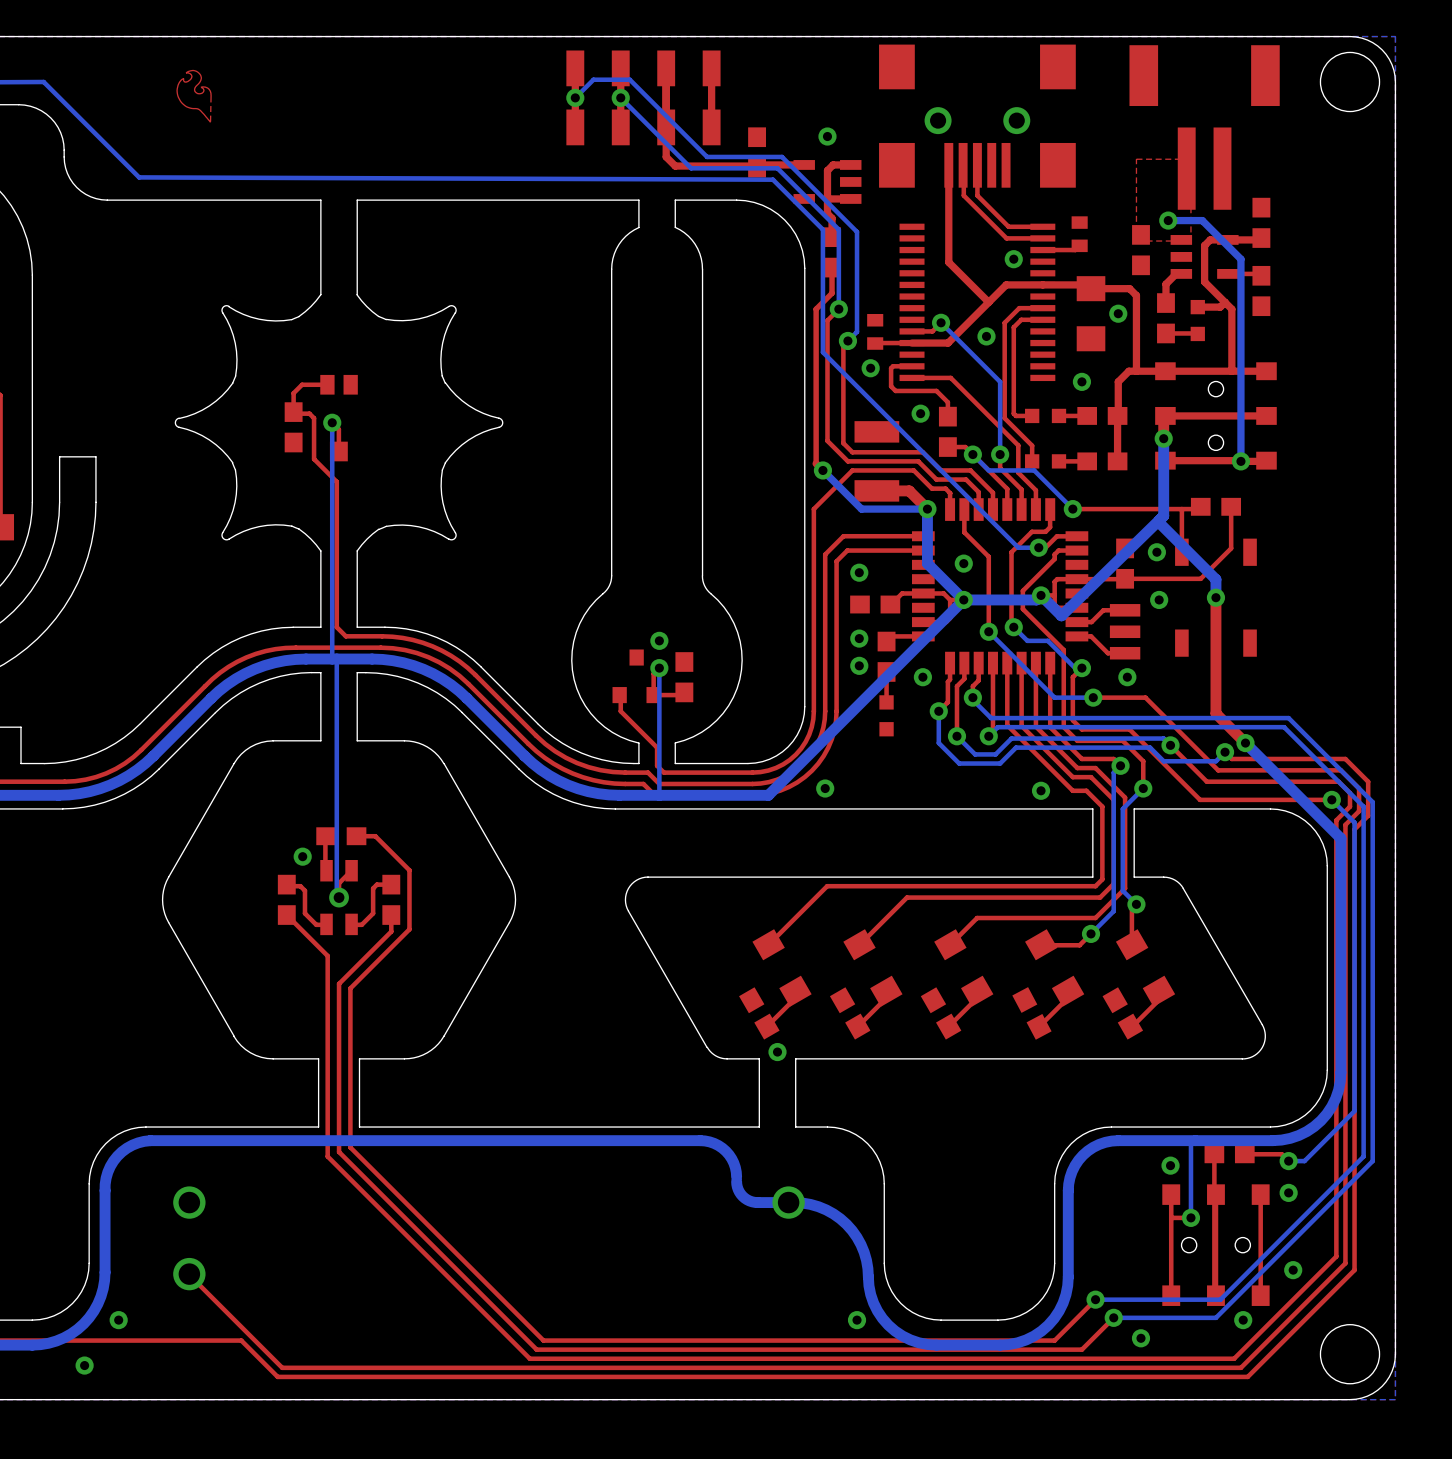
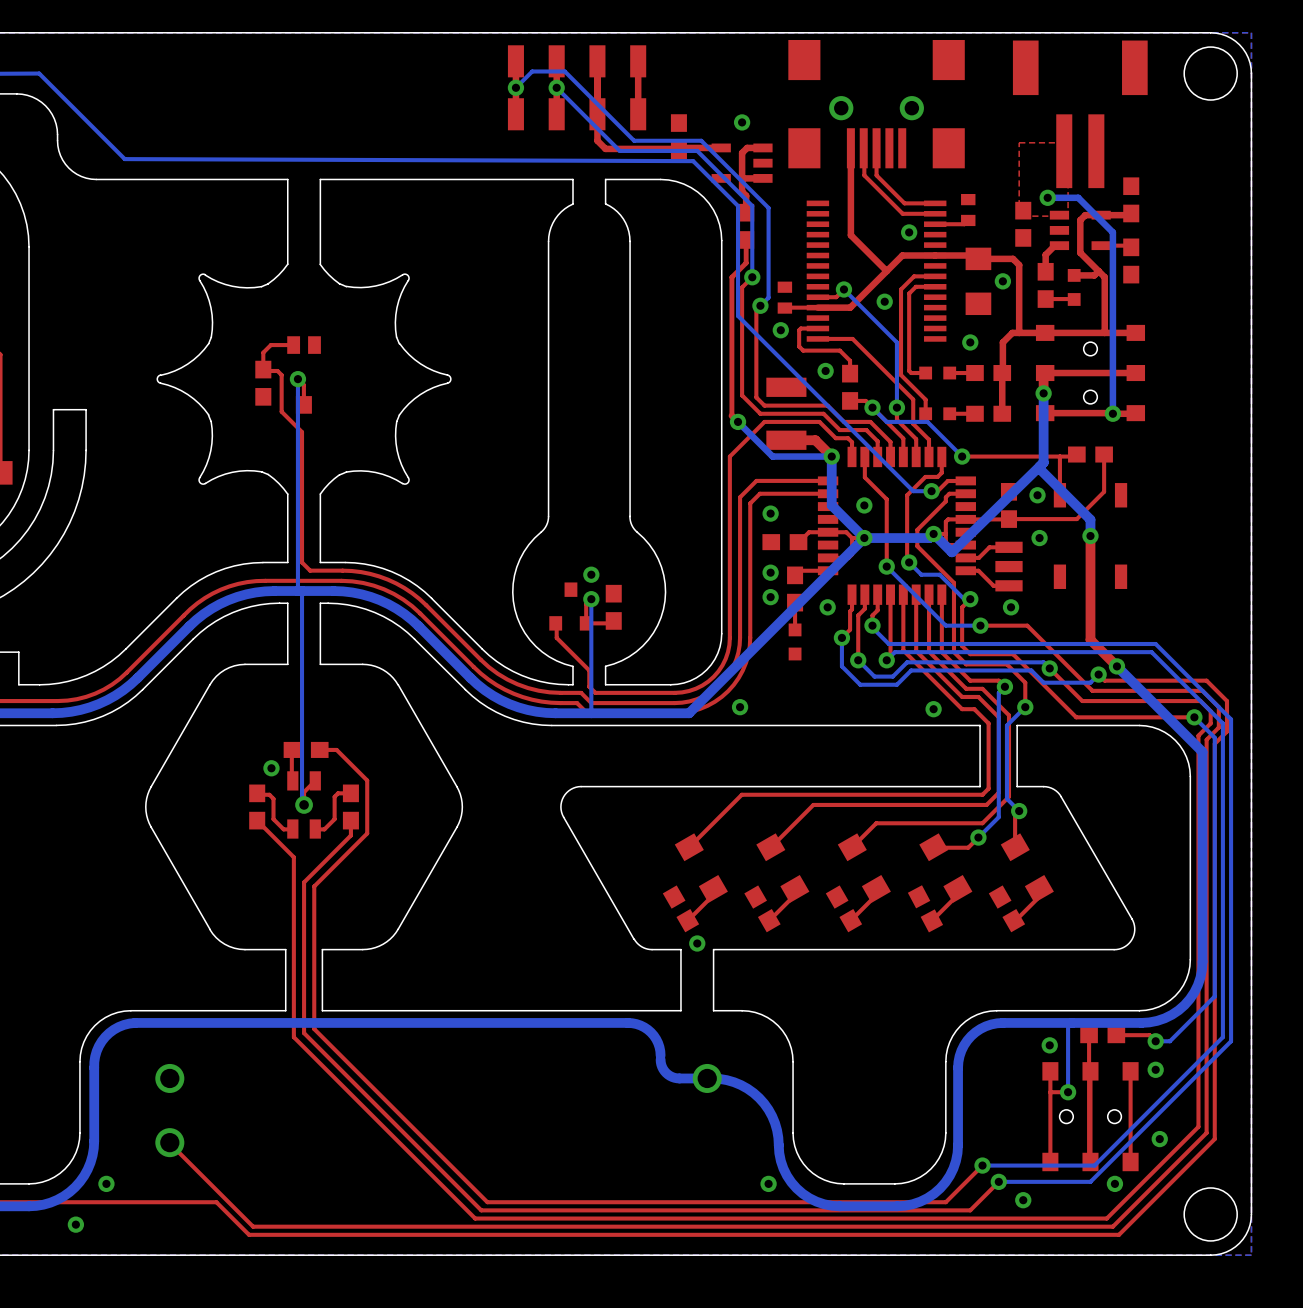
top zone outline: (186, 72) (193, 70) (198, 73) (201, 79) (194, 90) (200, 93) (203, 89) -> none
top zone outline: (186, 73) (191, 74) -> none
top zone outline: (191, 75) (191, 77) -> none
top zone outline: (191, 77) (186, 81) (183, 81) -> none
top zone outline: (183, 80) (183, 78) (179, 82) (177, 89) (180, 101) (187, 107) (199, 109) (210, 122) -> none
top zone outline: (201, 87) (206, 87) (210, 92) (210, 122) -> none
top zone outline: (201, 87) (203, 88) -> none

